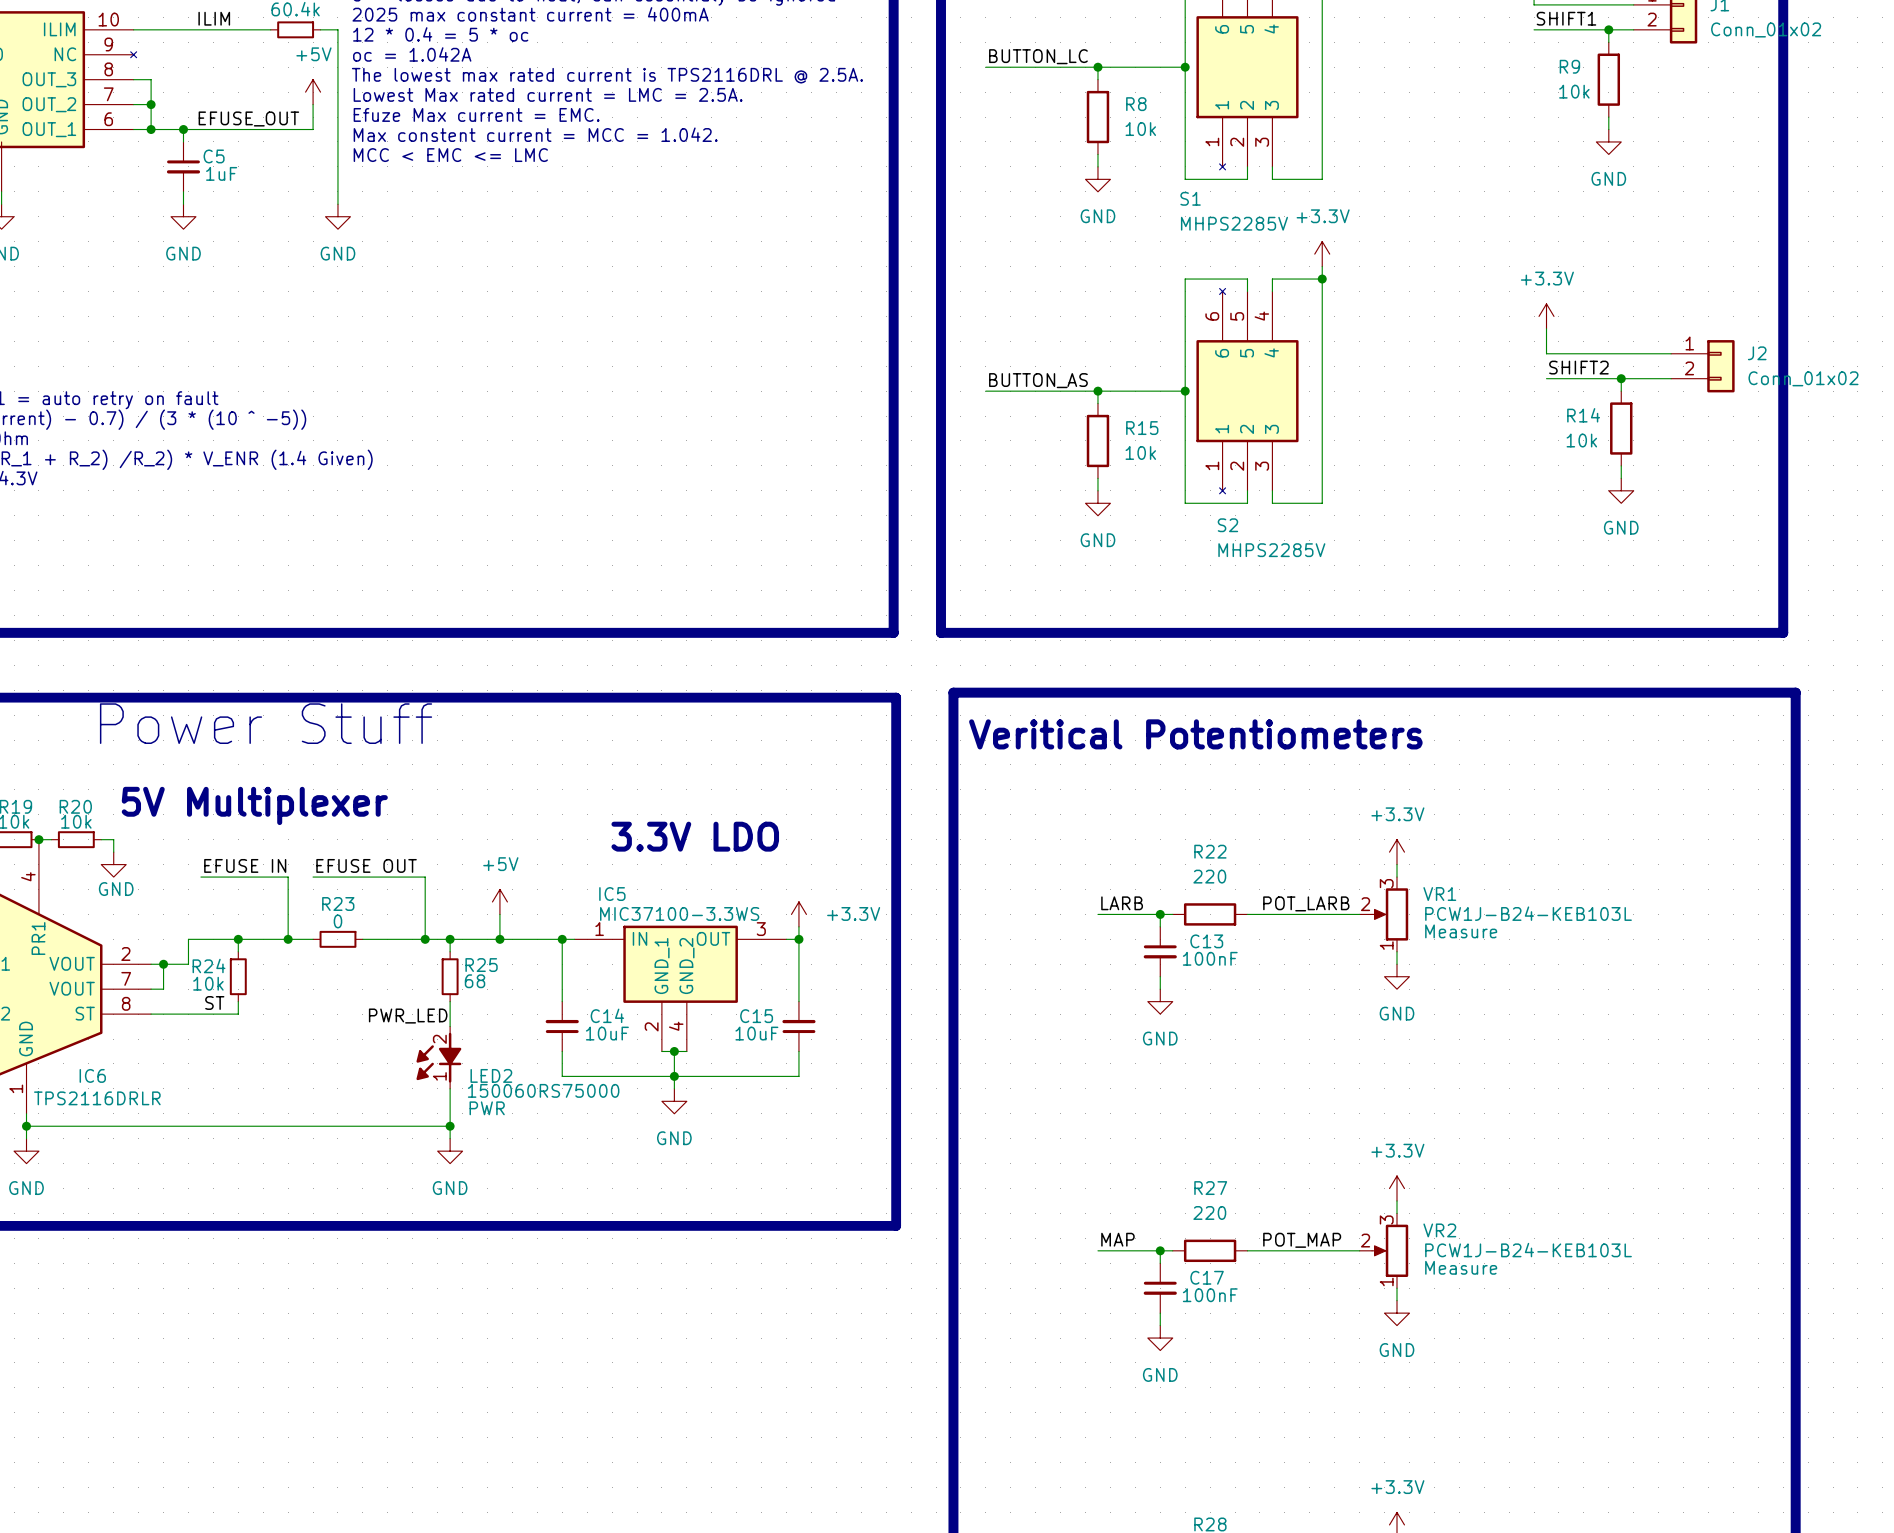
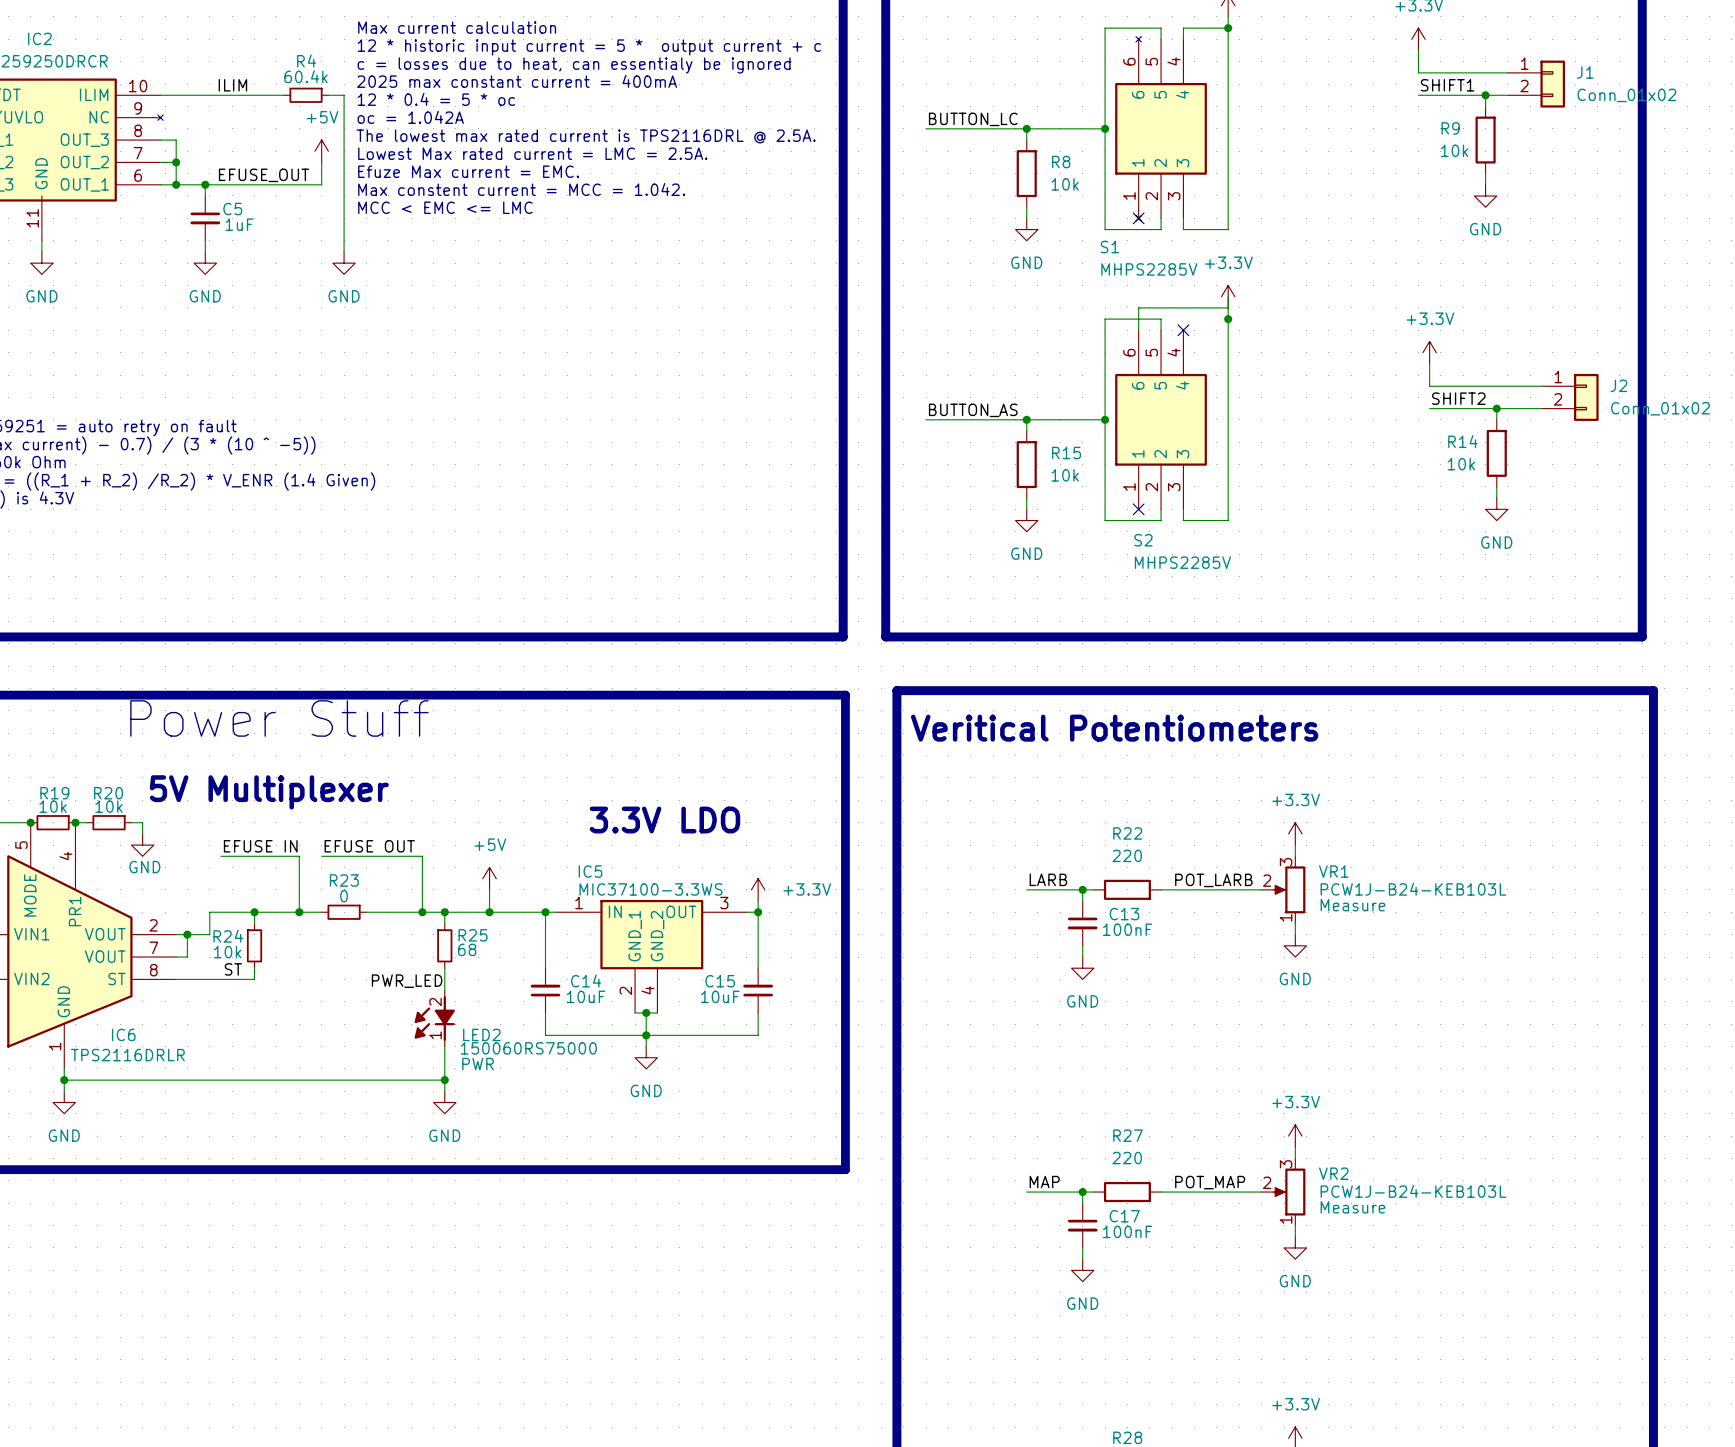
no-connect mark: none -> (1138, 218)
wire: none -> (1228, 296) (1228, 307) (1138, 307) (1138, 330)
wire: (1322, 279) (1272, 279) (1272, 291) -> none
S2 symbol: [1196, 288, 1299, 494] -> [1115, 330, 1207, 510]
no-connect mark: none -> (1183, 330)
no-connect mark: none -> (1138, 509)

